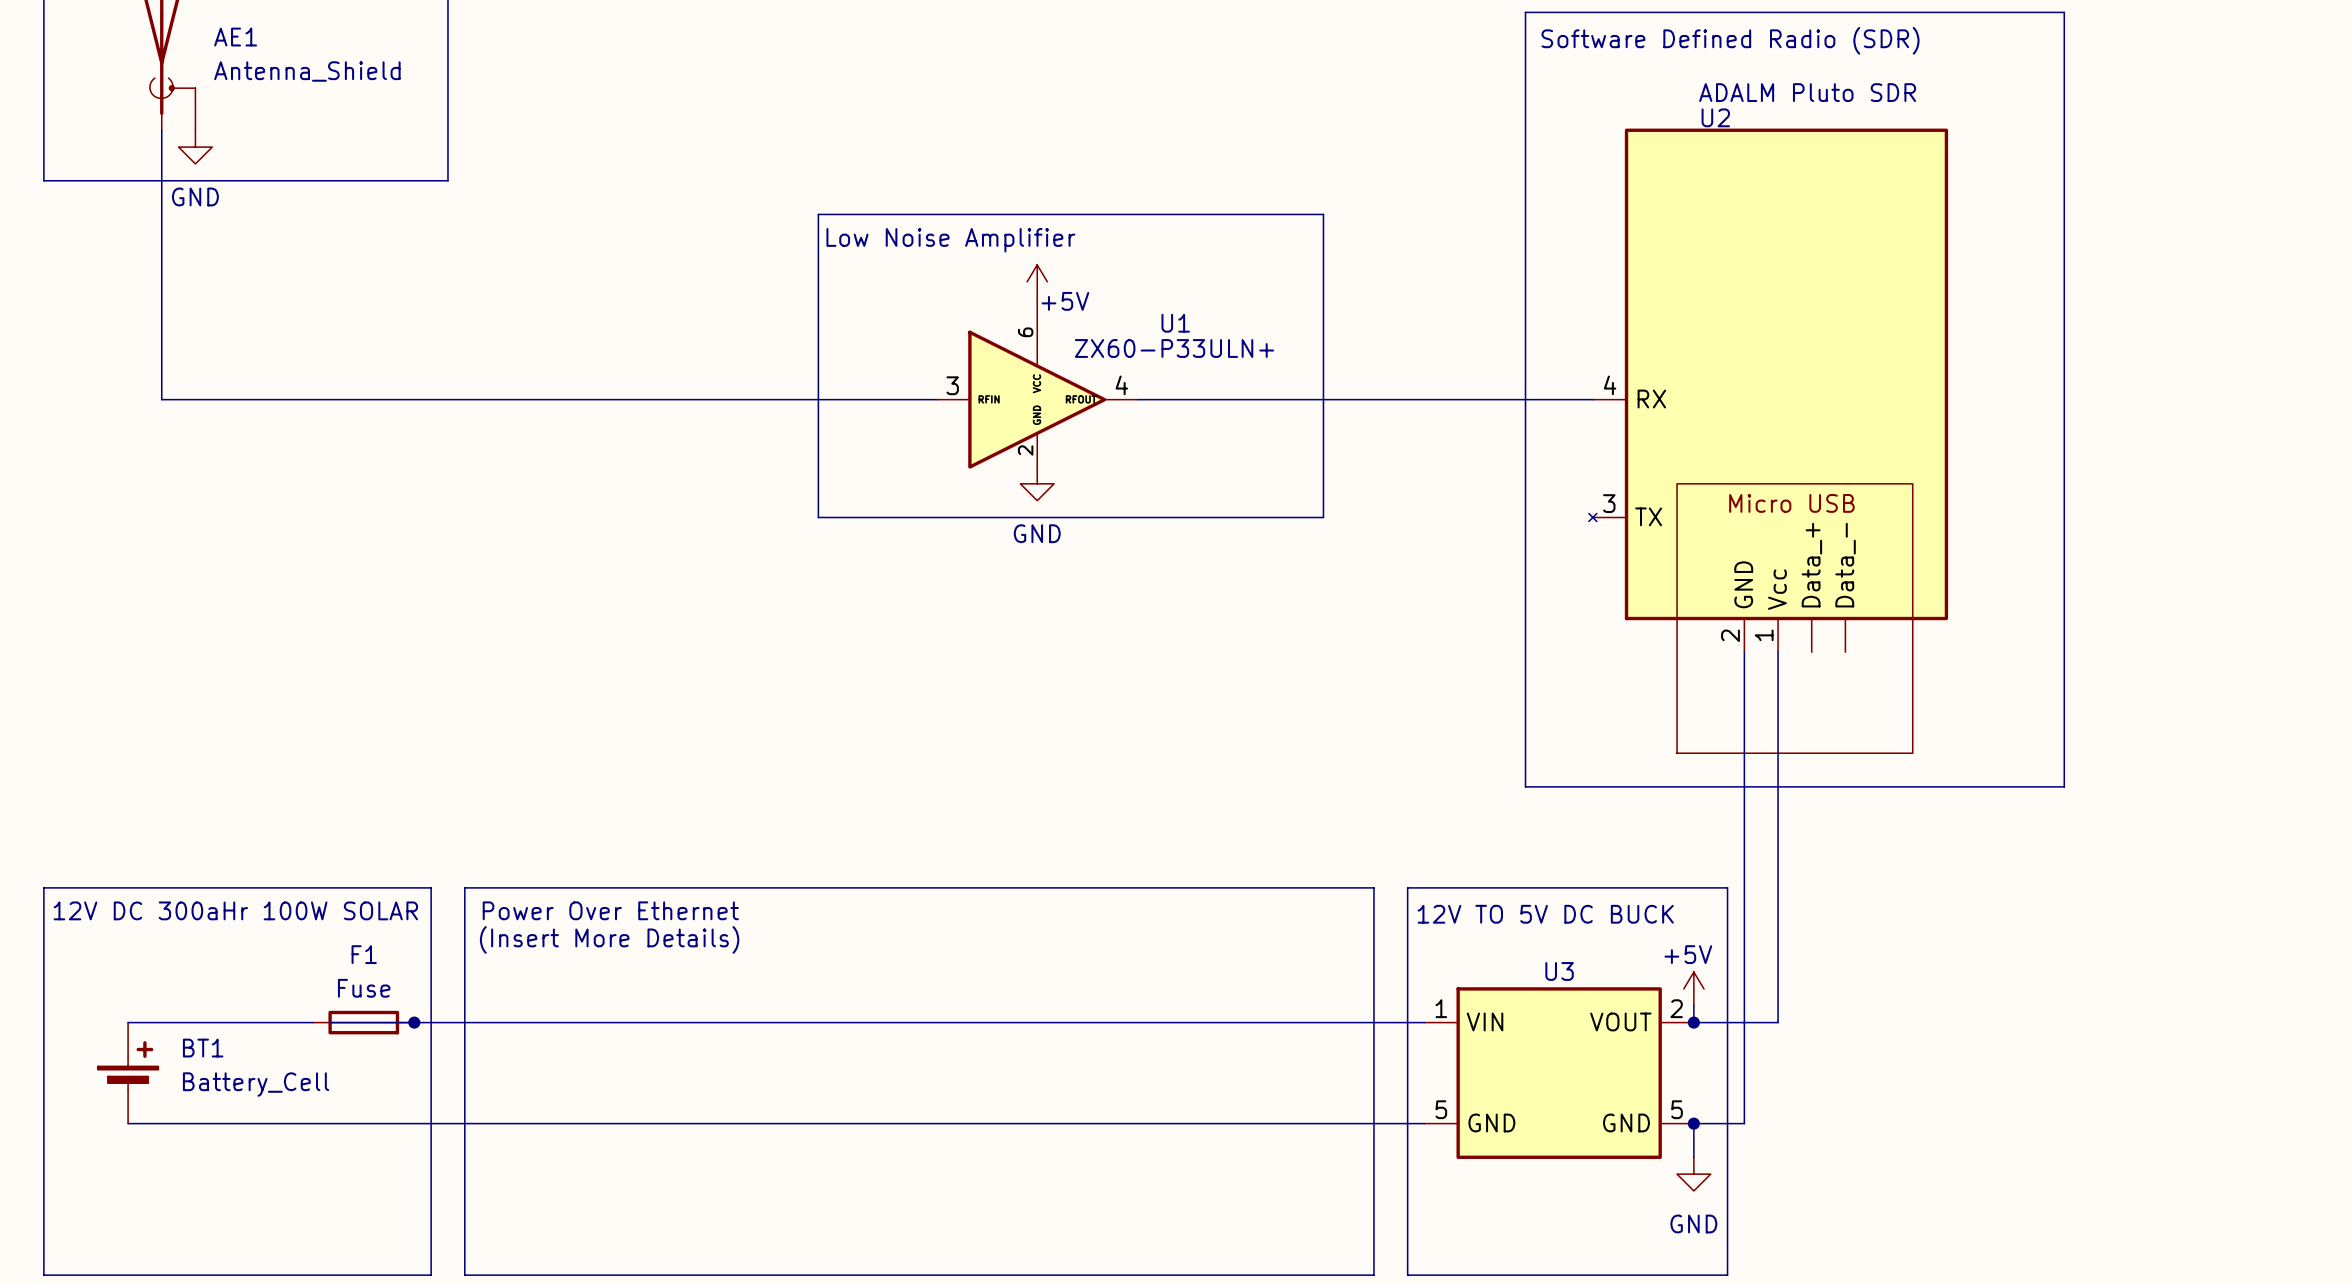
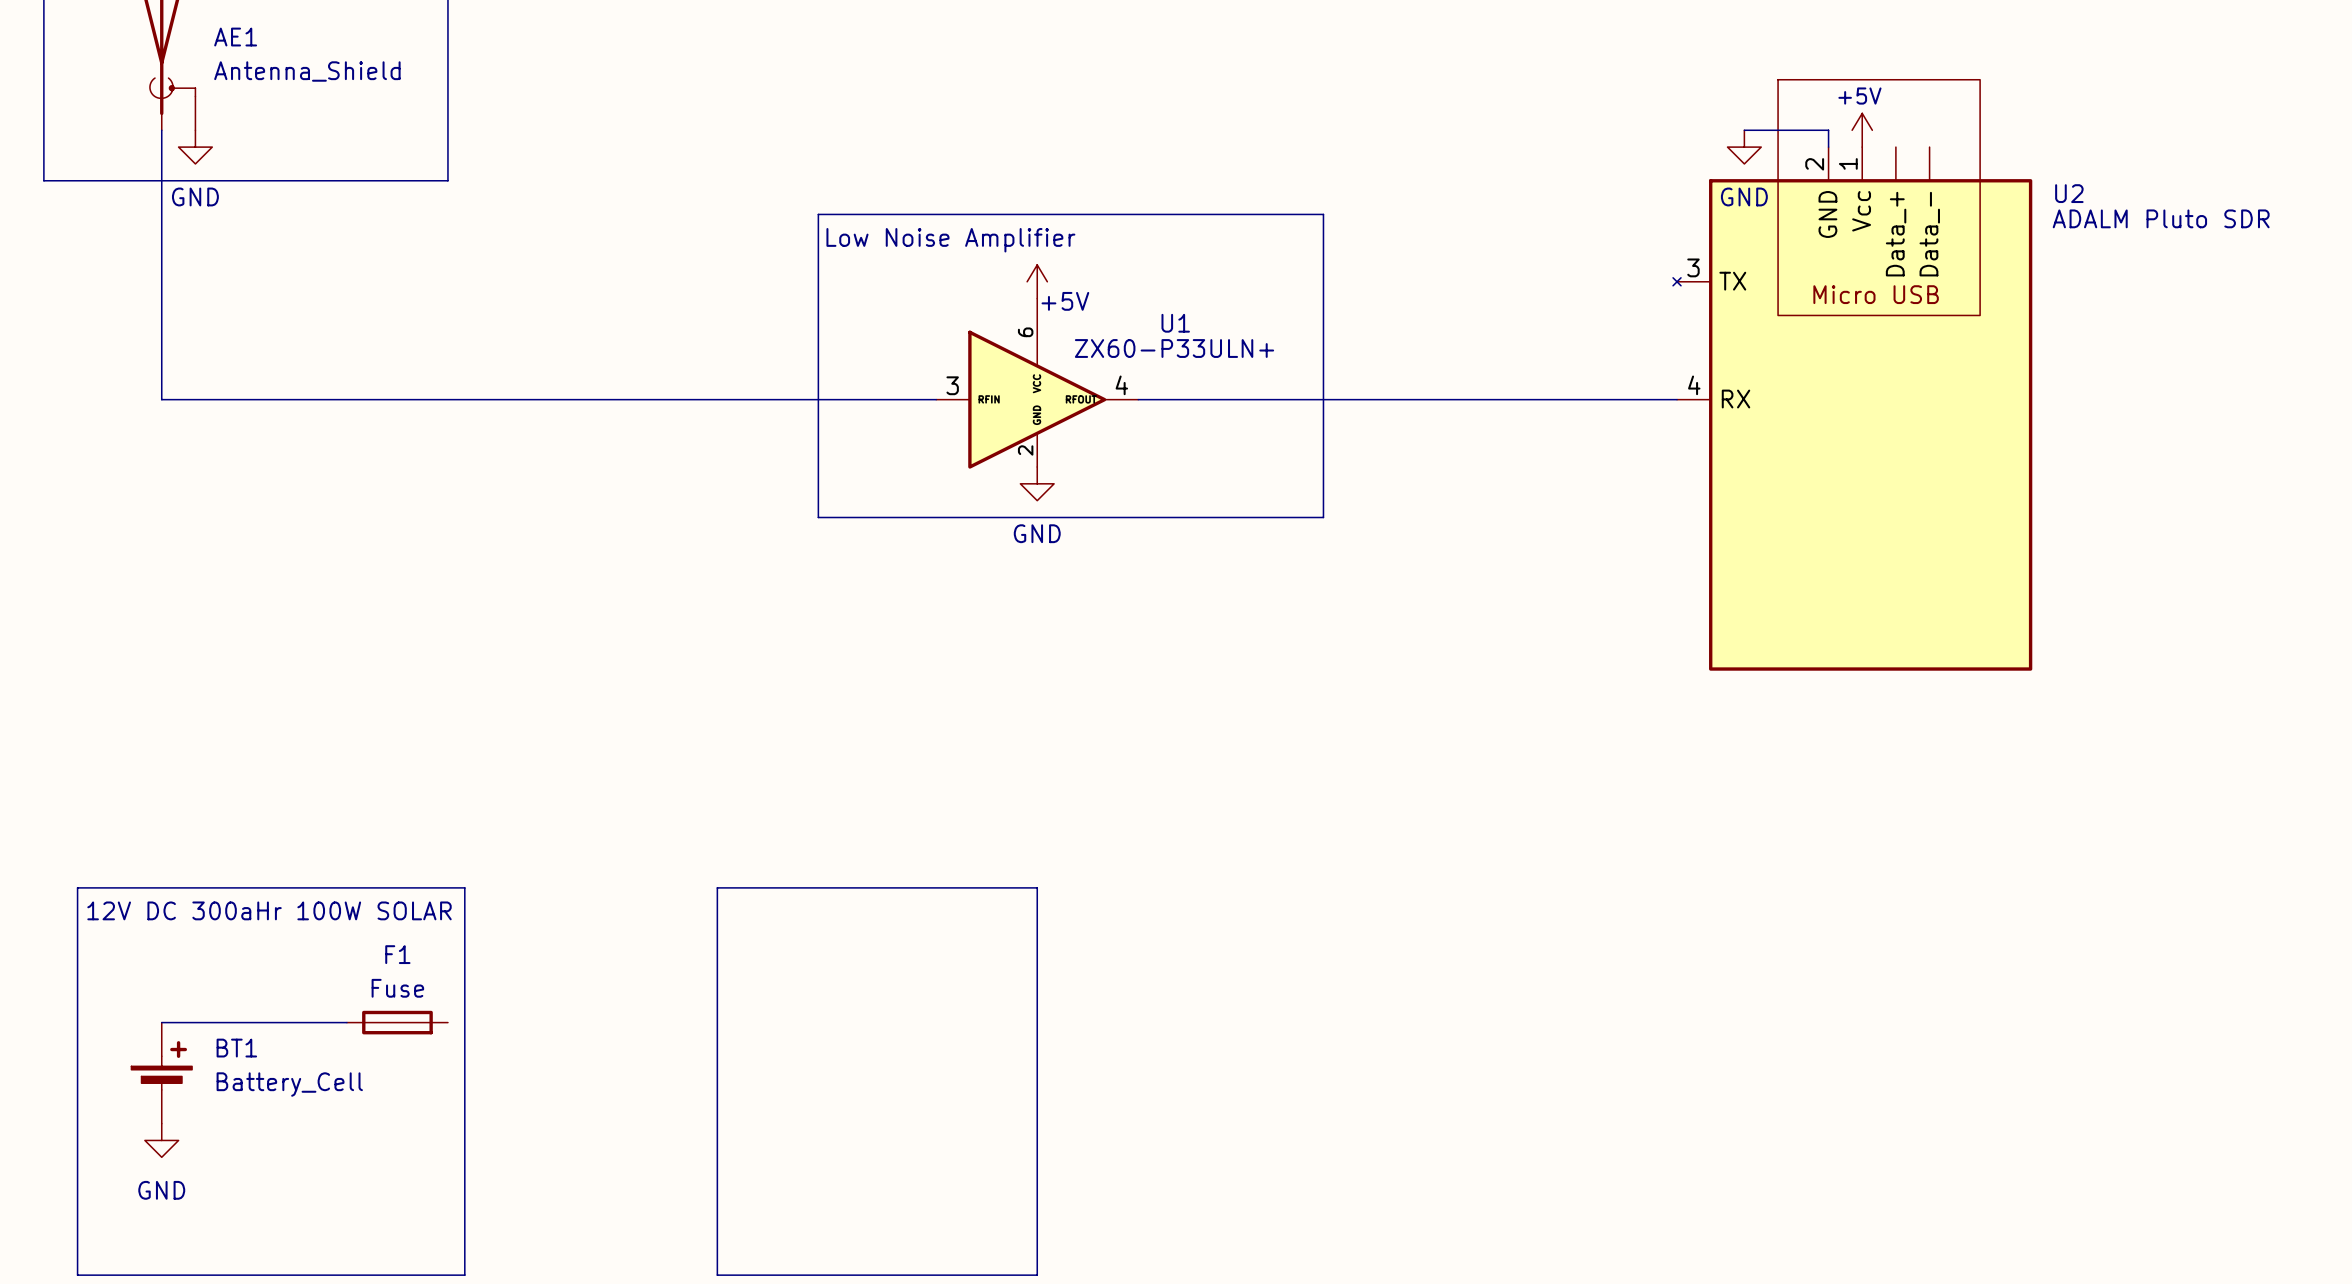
line: (1525, 12) (2064, 12) (2064, 786) (1525, 786) (1525, 12) -> none
text: Software Defined Radio (SDR) (1730, 40) -> none
U2 value position: ADALM Pluto SDR (1807, 92) -> ADALM Pluto SDR (2161, 218)
U2 name position: U2 (1715, 117) -> U2 (2069, 193)
U2 symbol: [1588, 128, 1949, 754] -> [1673, 79, 2033, 671]
power symbol: none -> +5V (1862, 130)
power symbol: none -> GND (1744, 147)
wire: (1744, 652) (1744, 1123) (1693, 1123) (1693, 1157) -> none
wire: (1778, 652) (1778, 1022) (1693, 1022) (1693, 1005) -> none
line: (77, 887) (43, 887) (43, 1275) (77, 1275) -> (77, 887) (77, 1275)
line: (431, 887) (431, 1275) -> (717, 887) (717, 1275)
line: (464, 887) (717, 887) -> (464, 887) (431, 887)
line: (1037, 887) (1373, 887) (1373, 1275) (1037, 1275) -> (1037, 887) (1037, 1275)
line: (1407, 887) (1727, 887) (1727, 1275) (1407, 1275) (1407, 887) -> none
text position: 12V DC 300aHr 100W SOLAR (235, 910) -> 12V DC 300aHr 100W SOLAR (269, 910)
text: Power Over Ethernet (610, 910) -> none
text: 12V TO 5V DC BUCK (1545, 914) -> none
text: (Insert More Details) (609, 939) -> none
power symbol: +5V (1693, 988) -> none
wire: (128, 1022) (161, 1022) -> none
wire: (346, 1022) (1424, 1022) -> none
F1 position: (363, 1022) -> (397, 1022)
junction: (414, 1022) -> none
junction: (1693, 1022) -> none
BT1 position: (128, 1073) -> (161, 1073)
U3: (1559, 1073) -> none
wire: (128, 1123) (1424, 1123) -> none
junction: (1693, 1123) -> none
power symbol: none -> GND (161, 1140)
power symbol: GND (1693, 1174) -> none
line: (464, 1275) (717, 1275) -> (464, 1275) (431, 1275)

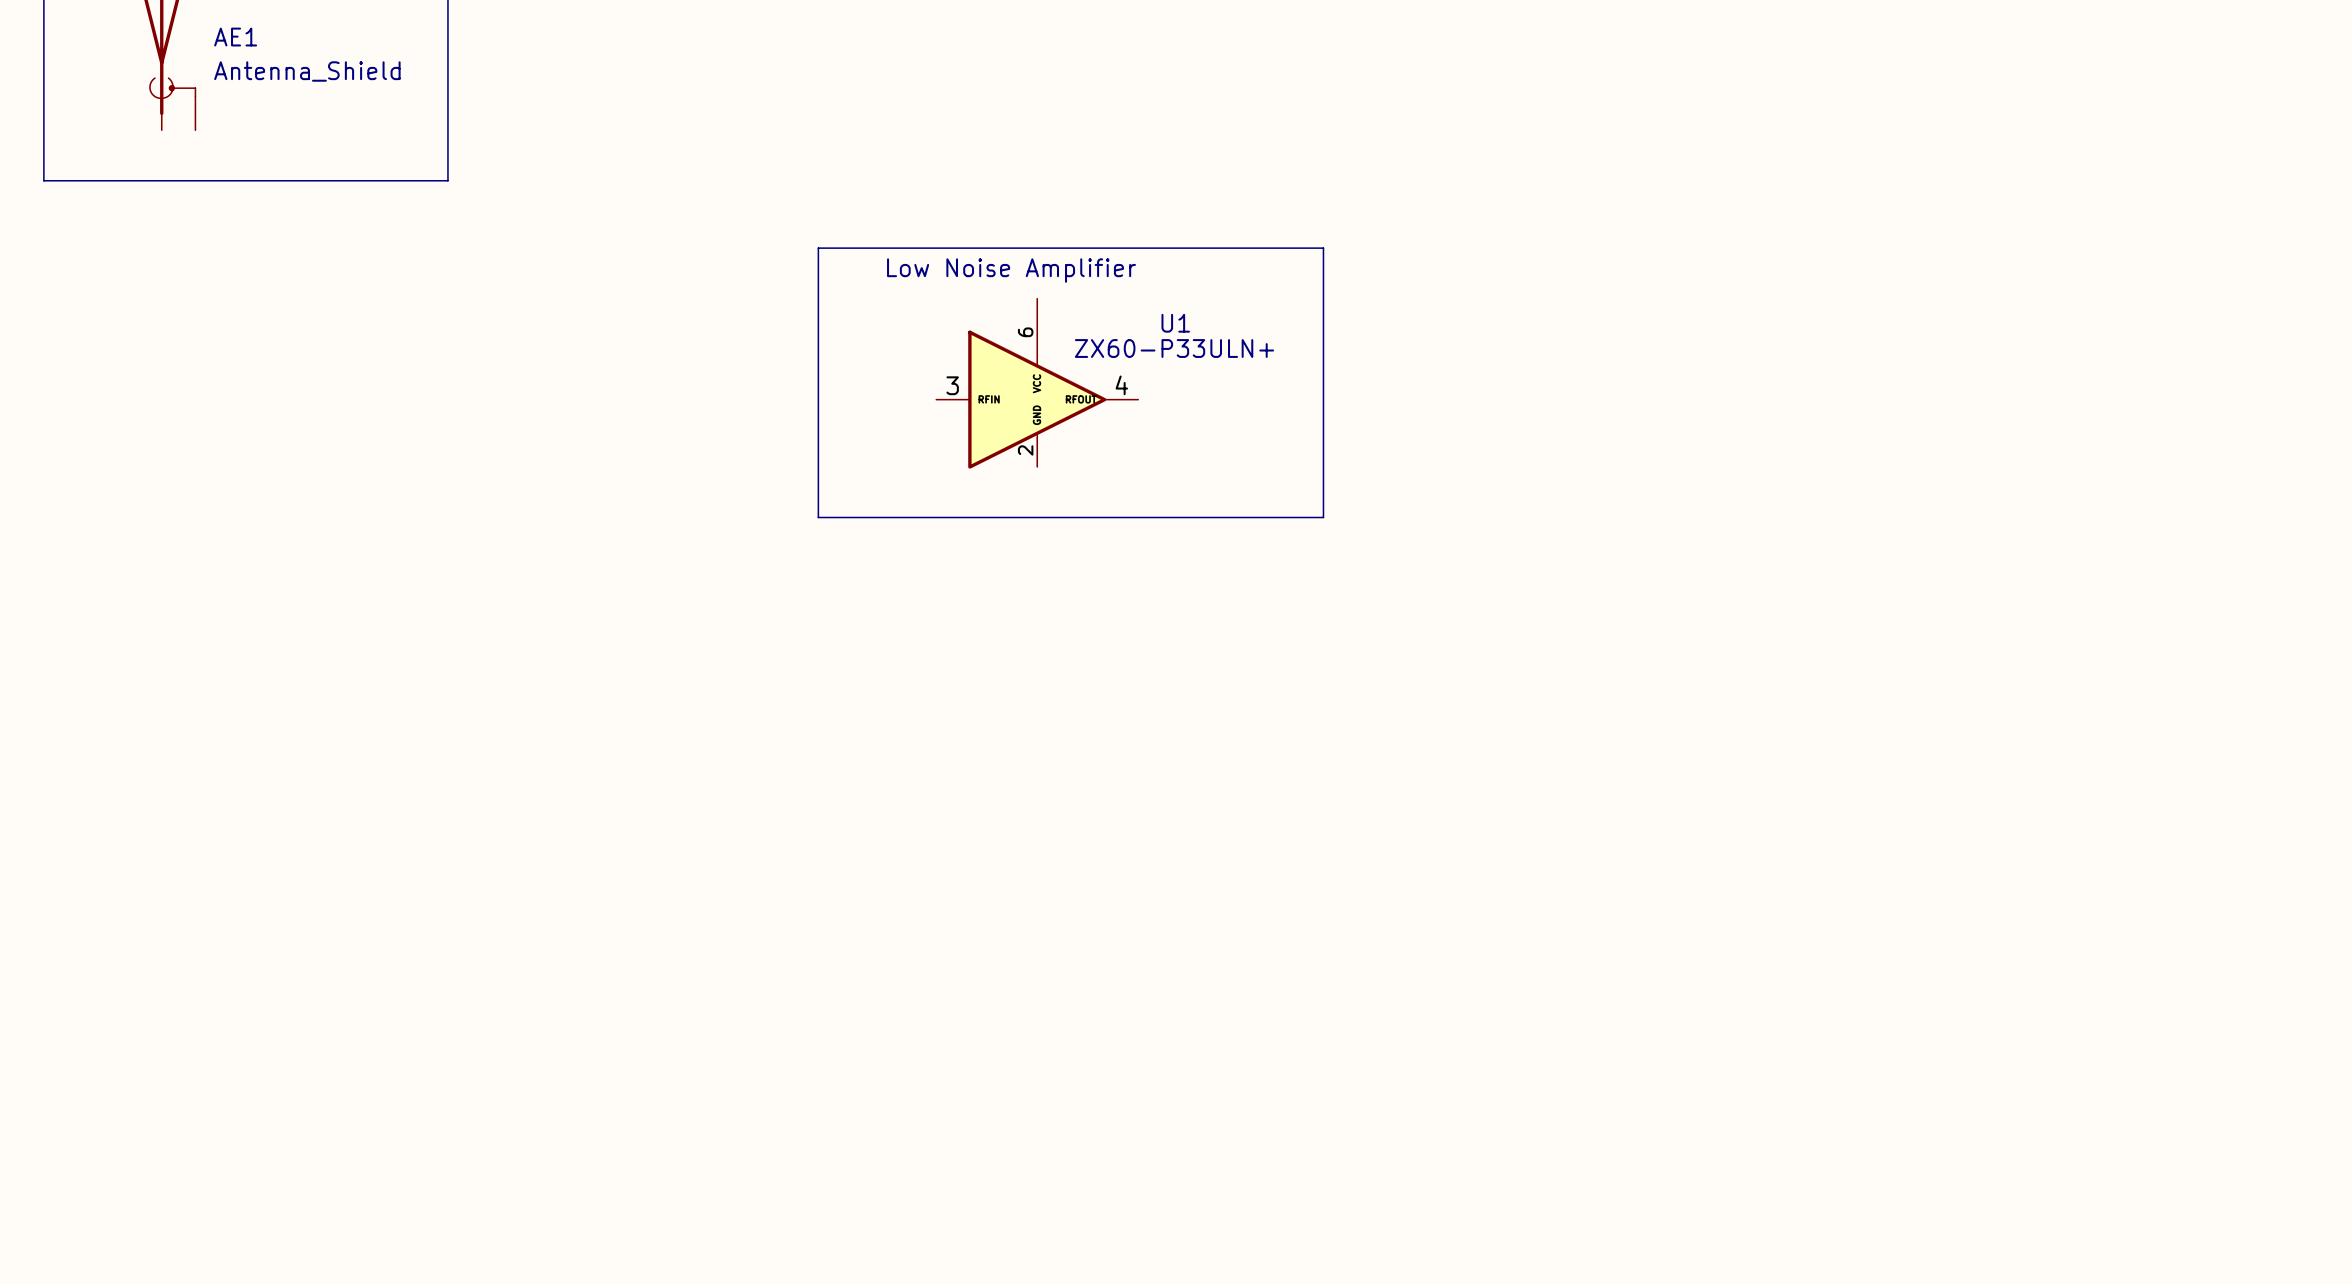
wire: (161, 130) (161, 399) (936, 399) -> none
wire: (1744, 130) (1828, 130) (1828, 147) -> none
power symbol: +5V (1862, 130) -> none
power symbol: GND (195, 147) -> none
power symbol: GND (1744, 147) -> none
text position: Low Noise Amplifier (950, 240) -> Low Noise Amplifier (1011, 270)
line: (818, 248) (818, 214) (1323, 214) (1323, 248) -> (818, 248) (1323, 248)
power symbol: +5V (1037, 281) -> none
U2: ADALM Pluto SDR (1852, 375) -> none
wire: (1138, 399) (1677, 399) -> none
power symbol: GND (1037, 483) -> none
line: (77, 887) (464, 887) (464, 1275) (77, 1275) (77, 887) -> none
line: (717, 887) (1037, 887) (1037, 1275) (717, 1275) (717, 887) -> none
text: 12V DC 300aHr 100W SOLAR (269, 910) -> none
wire: (161, 1022) (346, 1022) -> none
F1: Fuse (397, 1022) -> none
BT1: Battery_Cell (161, 1073) -> none
power symbol: GND (161, 1140) -> none

